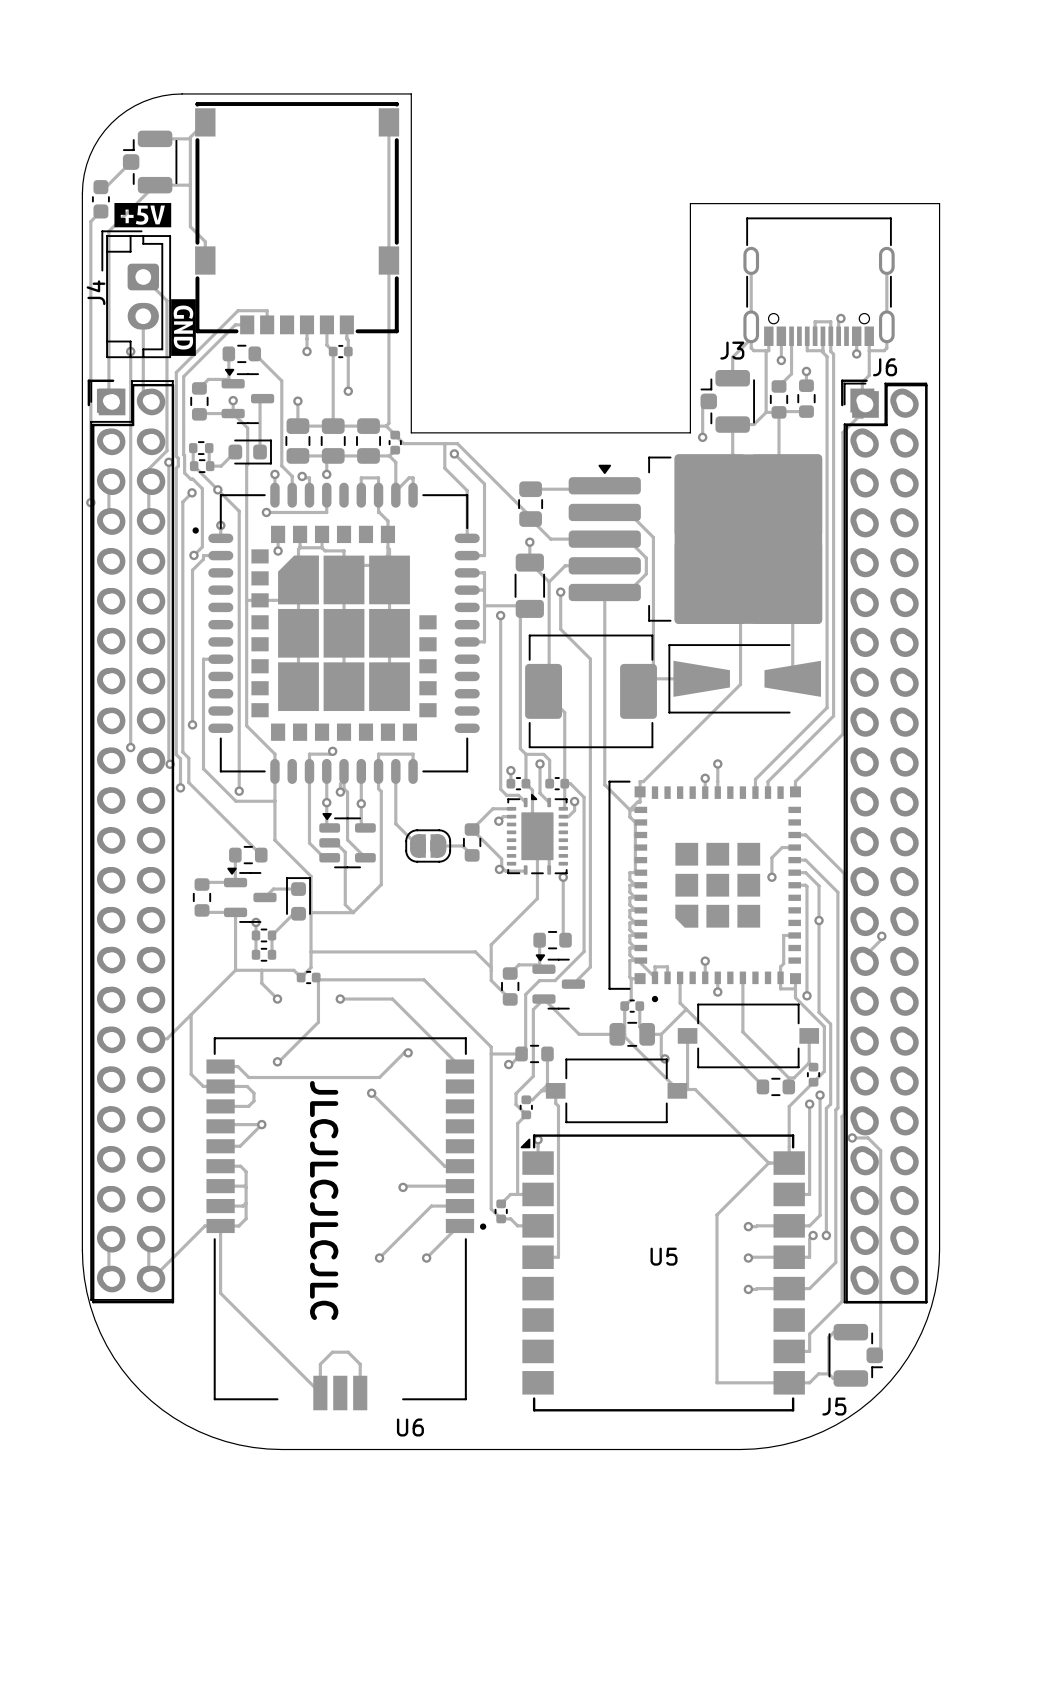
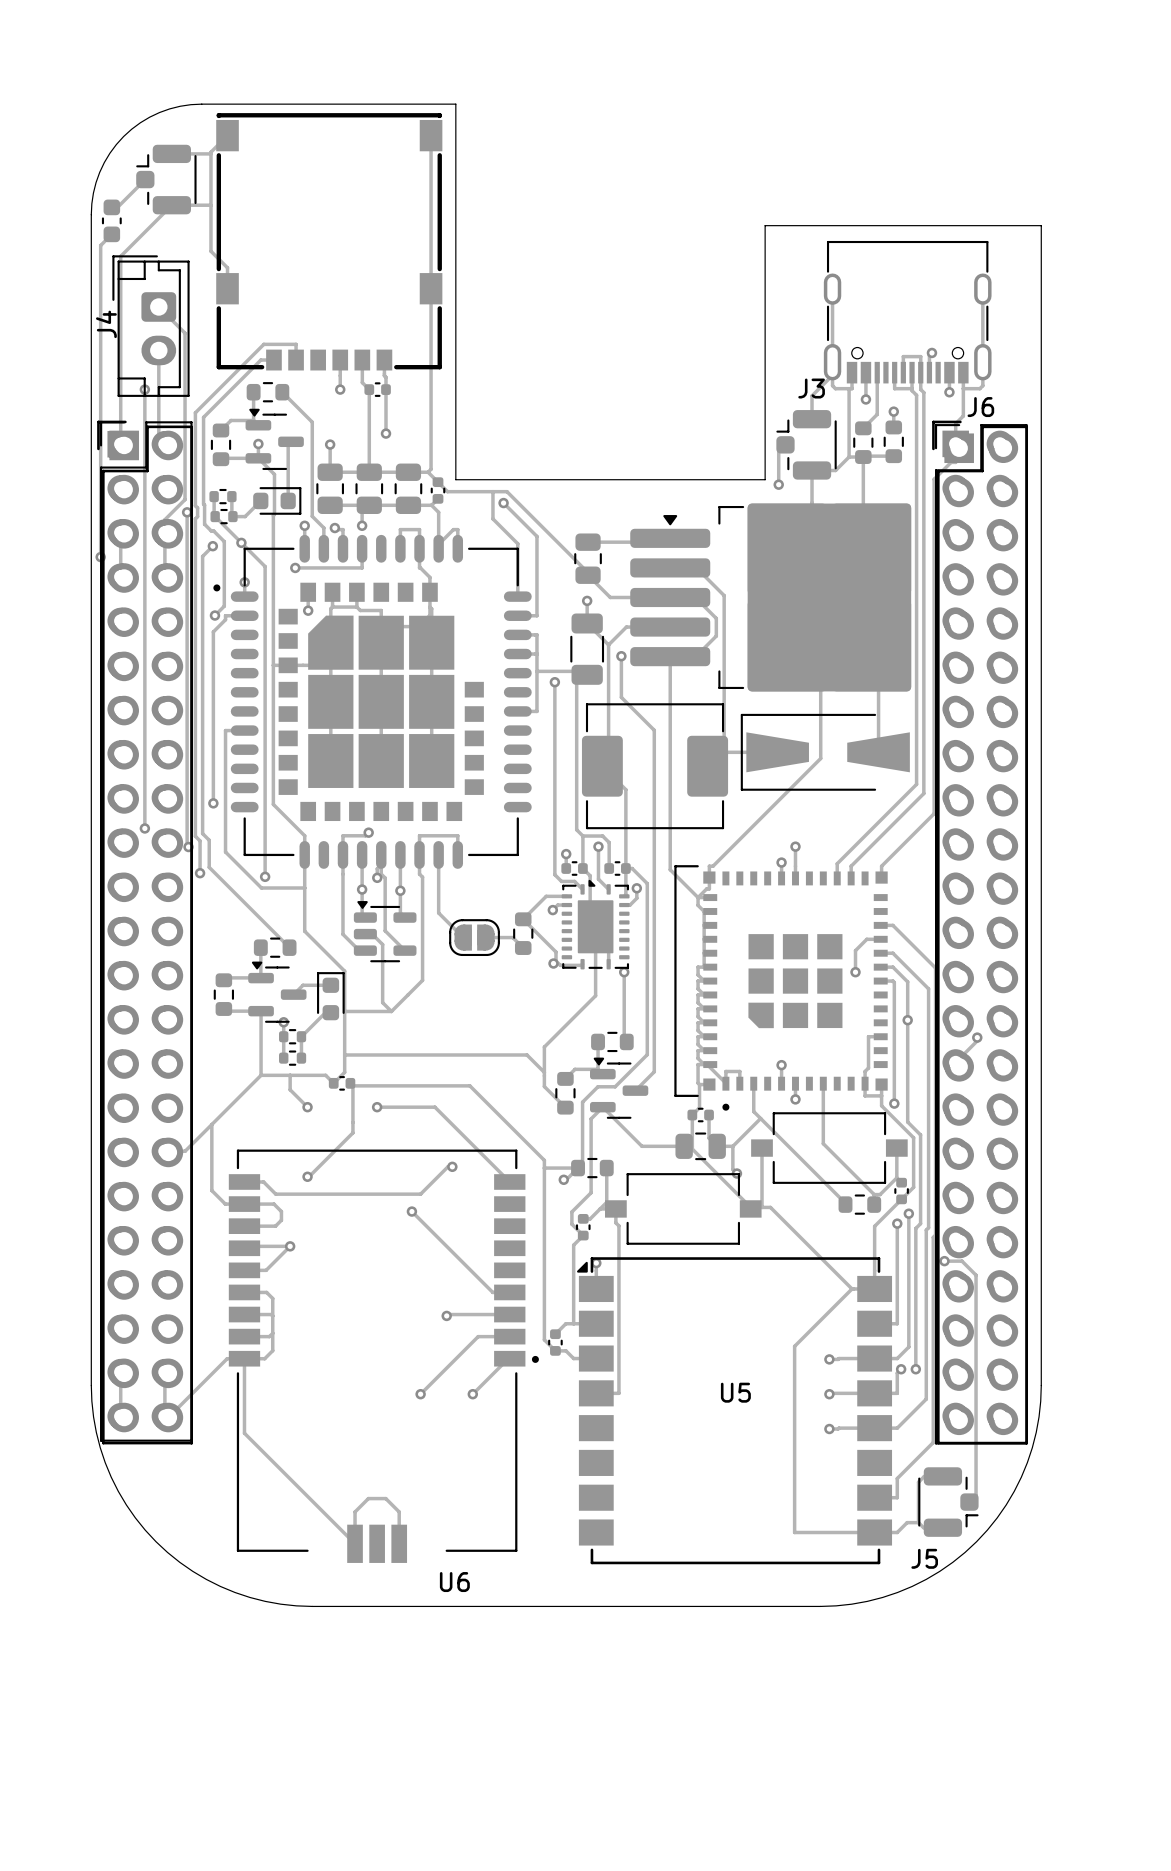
drawing: [114, 203, 172, 228] -> none
drawing: [171, 299, 196, 356] -> none
text: JLCJLCJLCJLC (324, 1200) -> none

